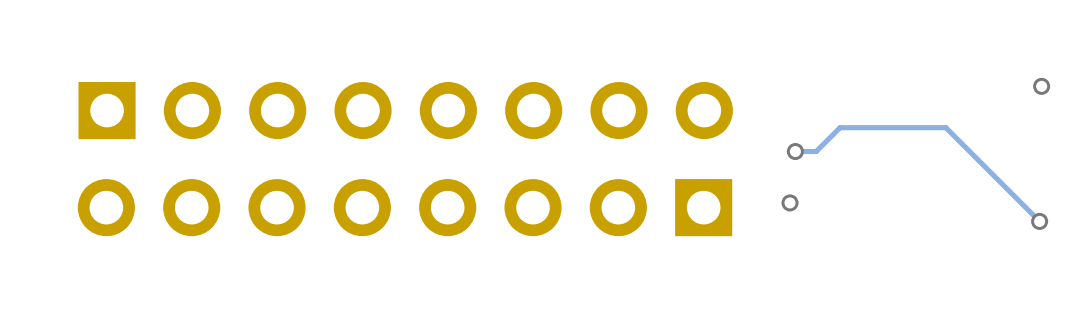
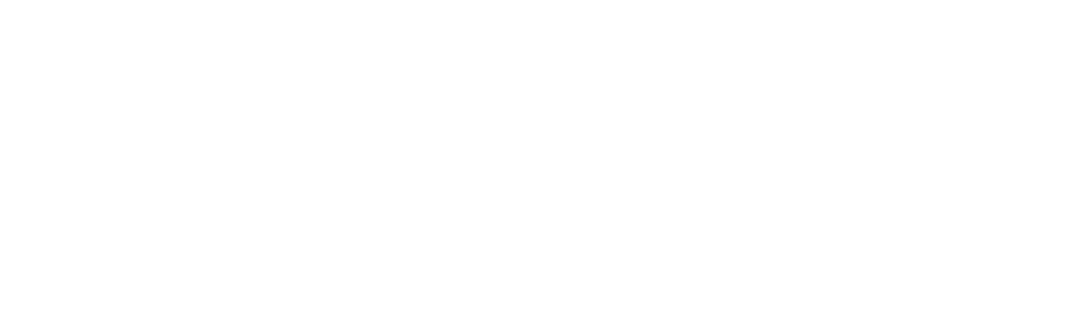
via: (1041, 86) -> none
part: (405, 110) -> none
track: (795, 151) (816, 151) (840, 127) (945, 127) (1039, 221) -> none
via: (795, 151) -> none
via: (790, 202) -> none
part: (405, 207) -> none
via: (1039, 221) -> none

